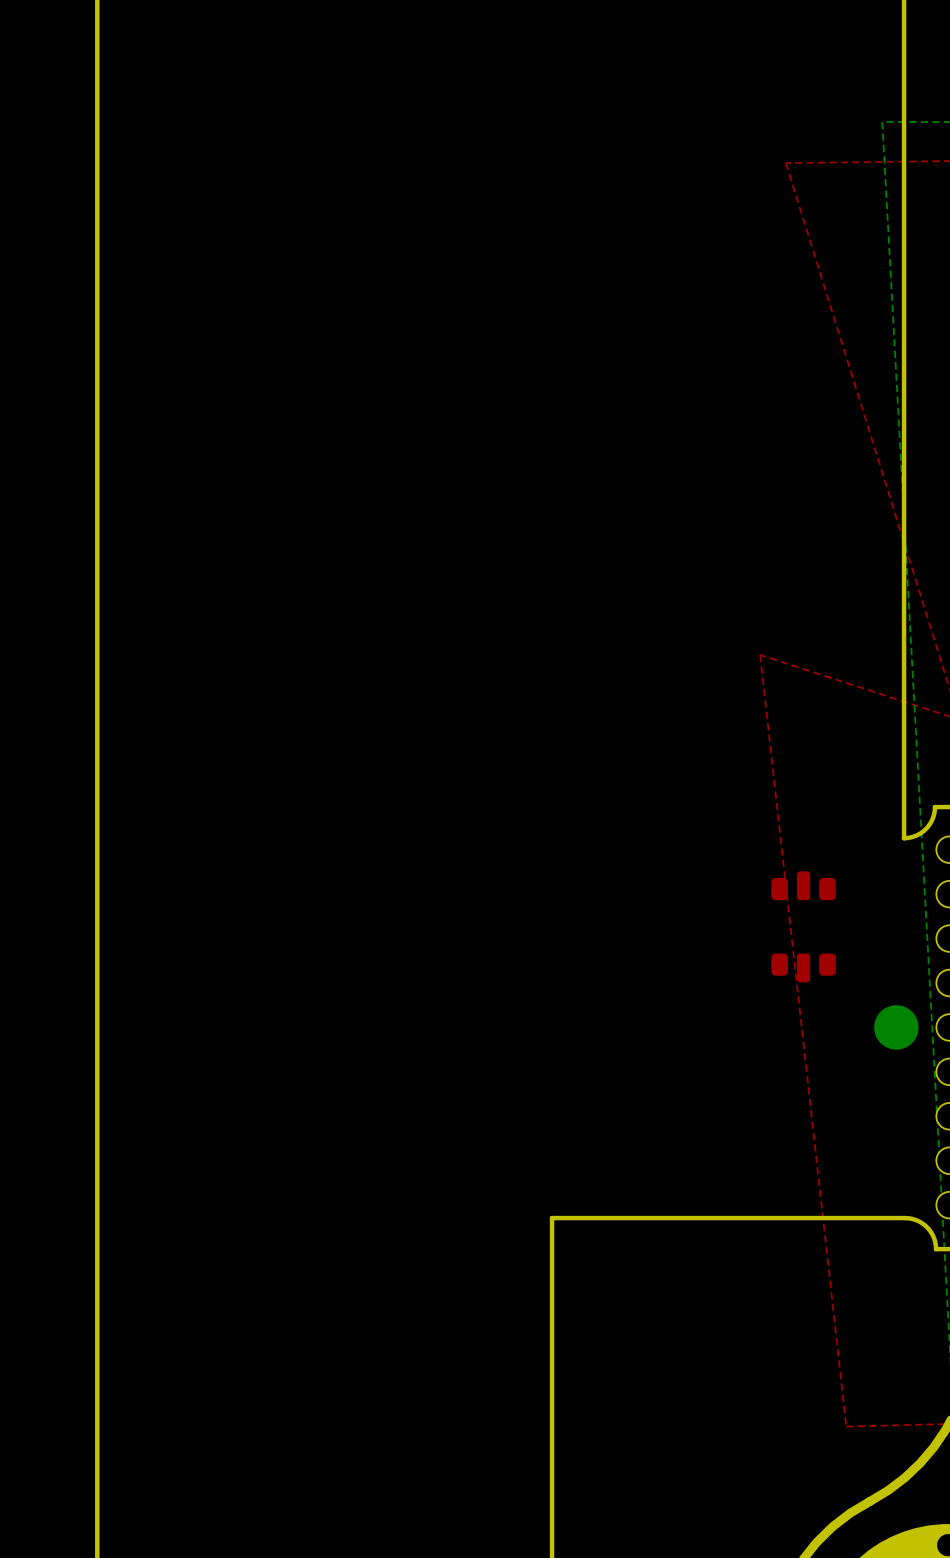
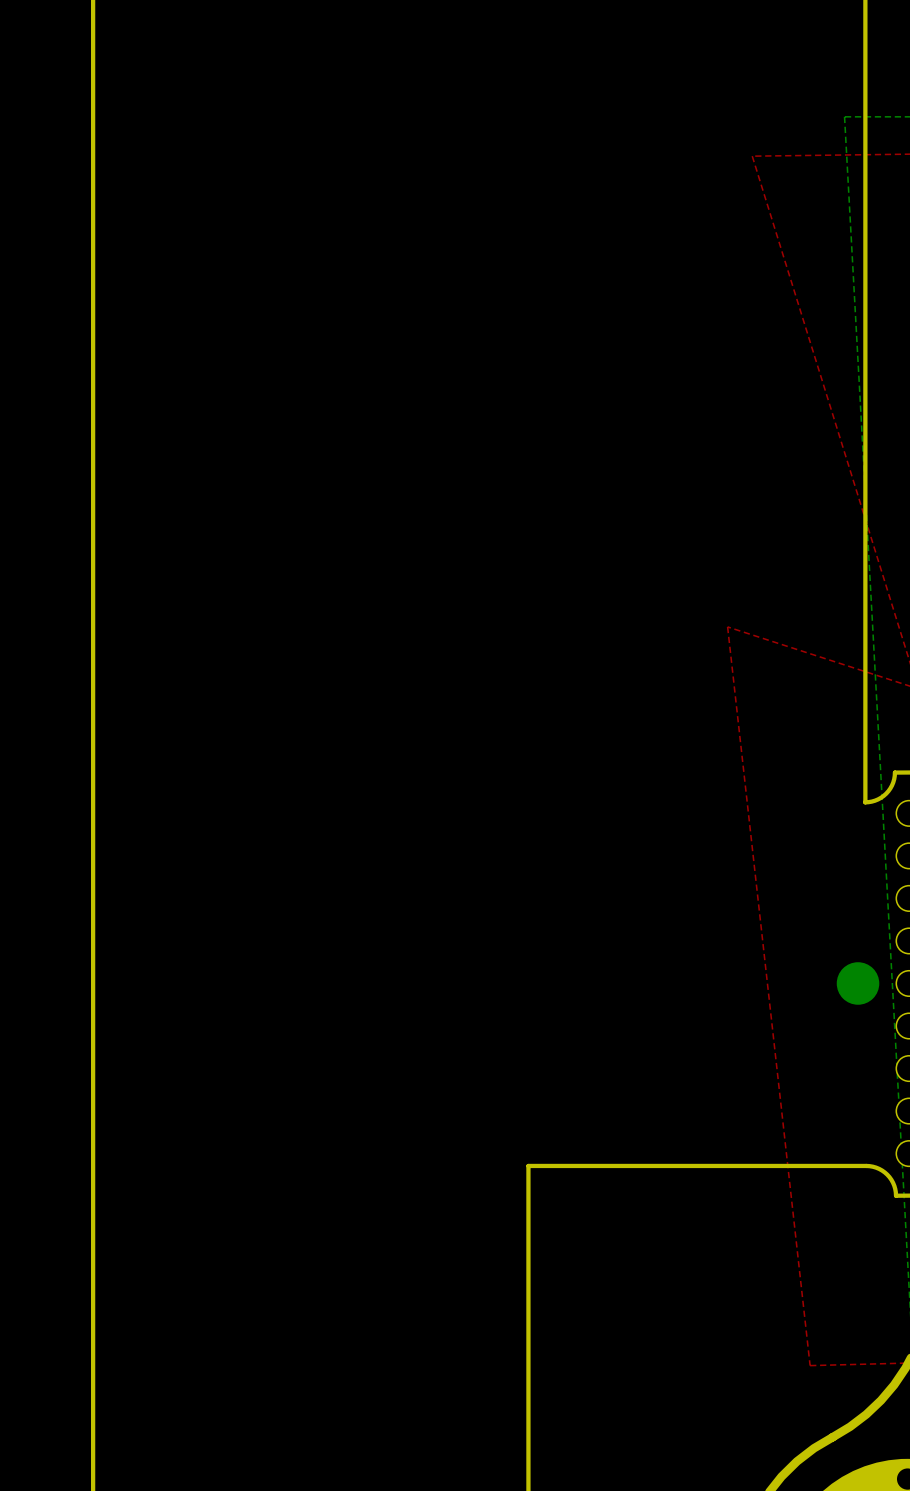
part: (803, 926) -> none

